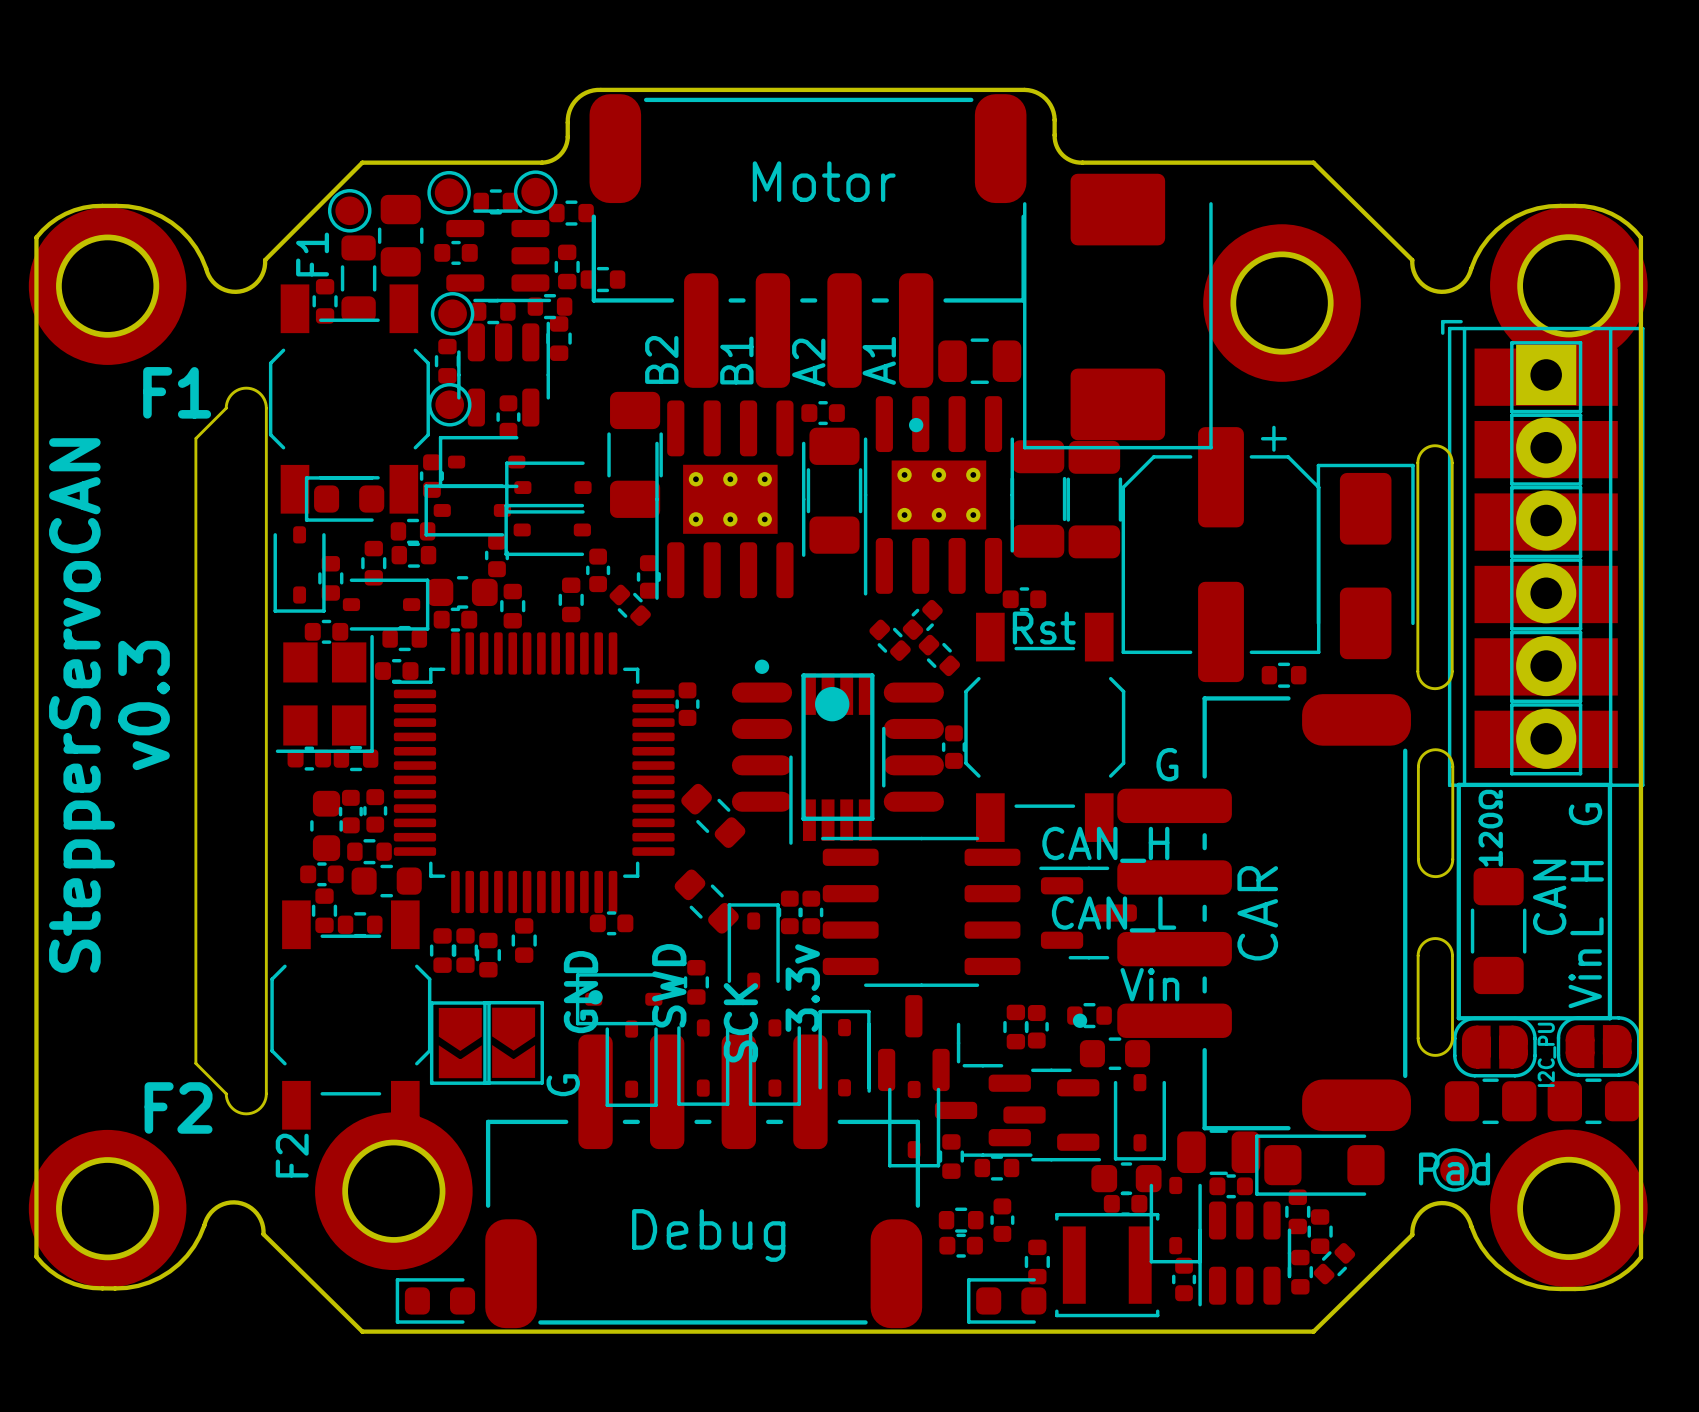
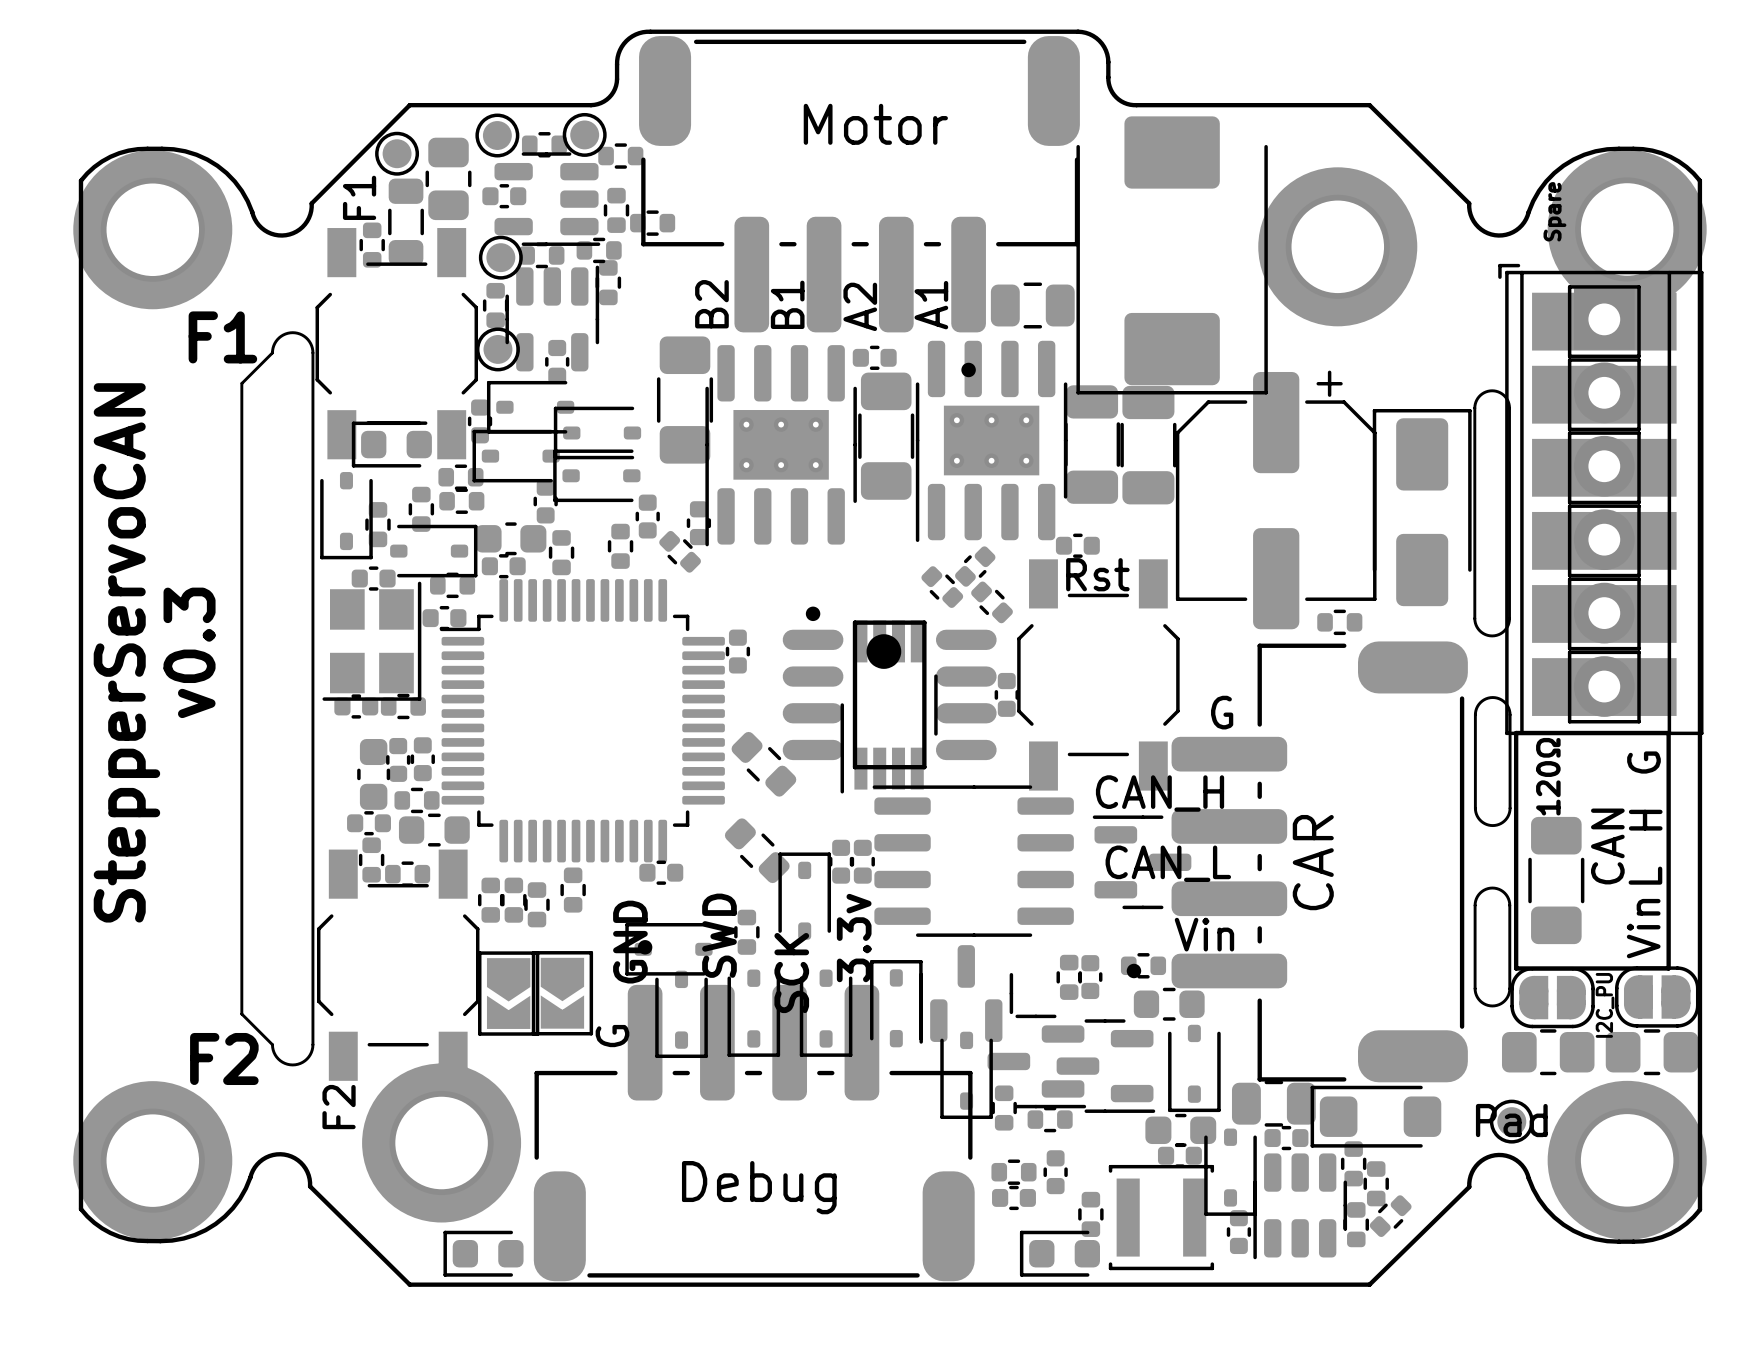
text: none -> Spare (1554, 211)

